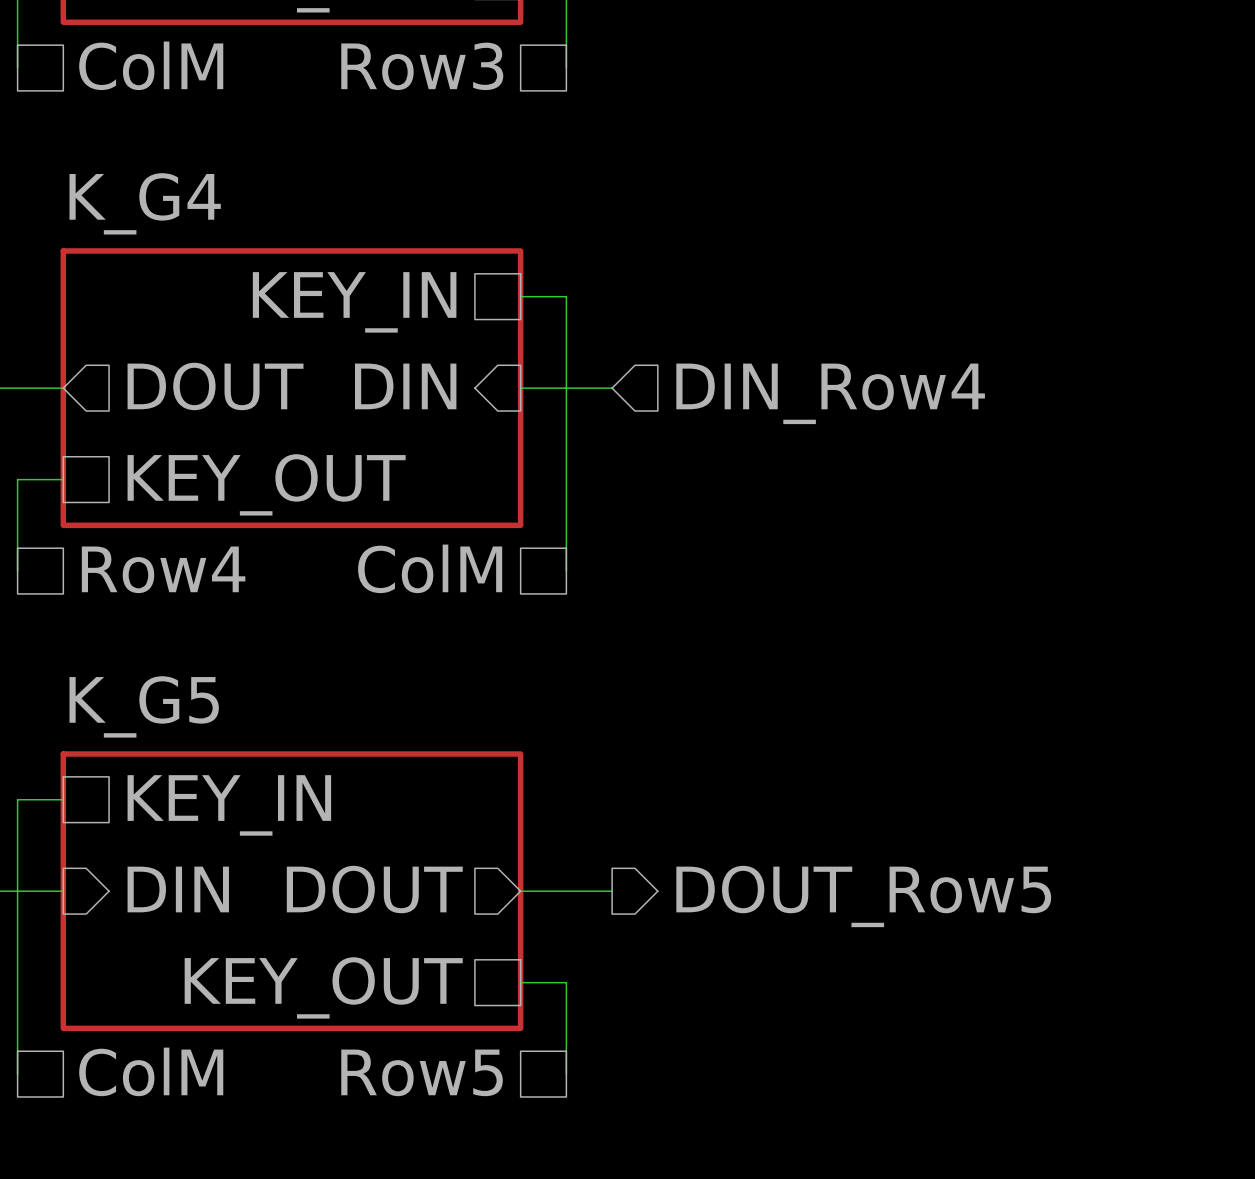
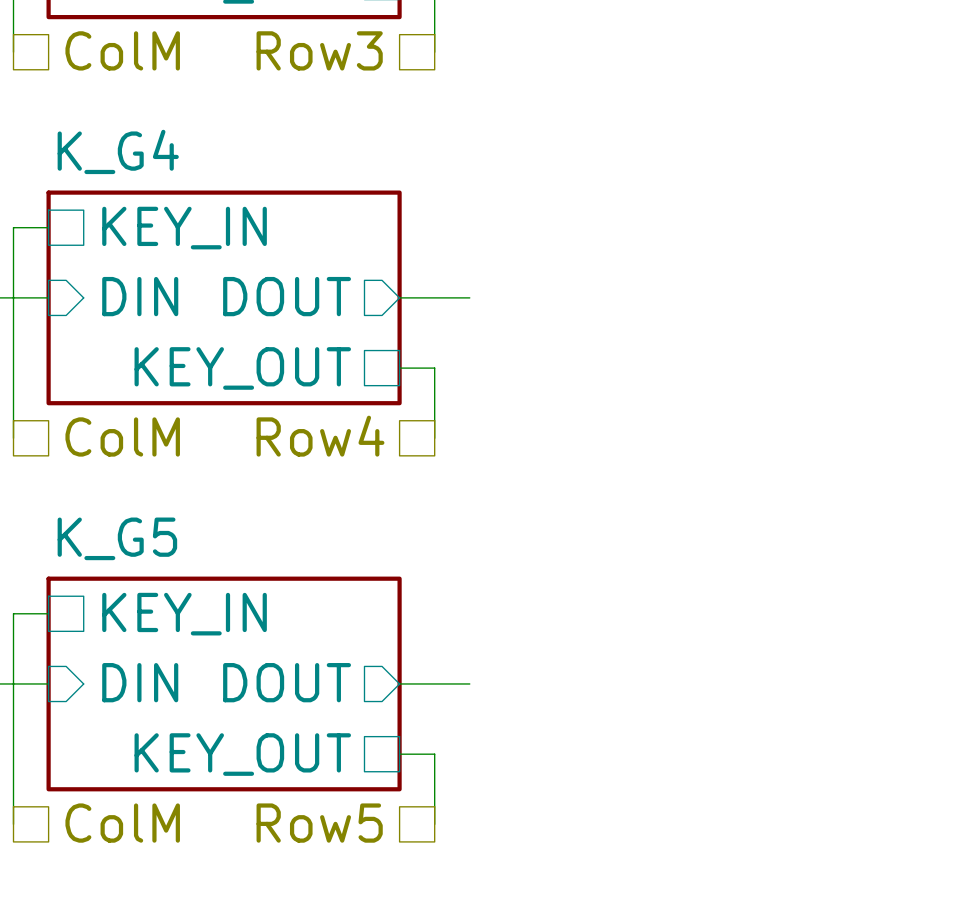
wire: (520, 296) (566, 296) (566, 479) -> (399, 368) (434, 368)
sheet pin rotation: 0° (354, 302) -> 180° (184, 228)
sheet pin shape: output (215, 386) -> input (140, 296)
sheet pin: DOUT (215, 386) -> DIN (140, 296)
sheet pin shape: input (405, 386) -> output (287, 296)
sheet pin: DIN (405, 386) -> DOUT (287, 296)
hierarchical label: DIN_Row4 (830, 393) -> none
wire: (17, 479) (63, 479) -> (13, 368) (13, 227) (48, 227)
sheet pin rotation: 0° (266, 484) -> 180° (242, 368)
hierarchical label: ColM (430, 568) -> Row4 (320, 436)
hierarchical label: Row4 (163, 569) -> ColM (122, 436)
hierarchical label: DOUT_Row5 (863, 896) -> none

